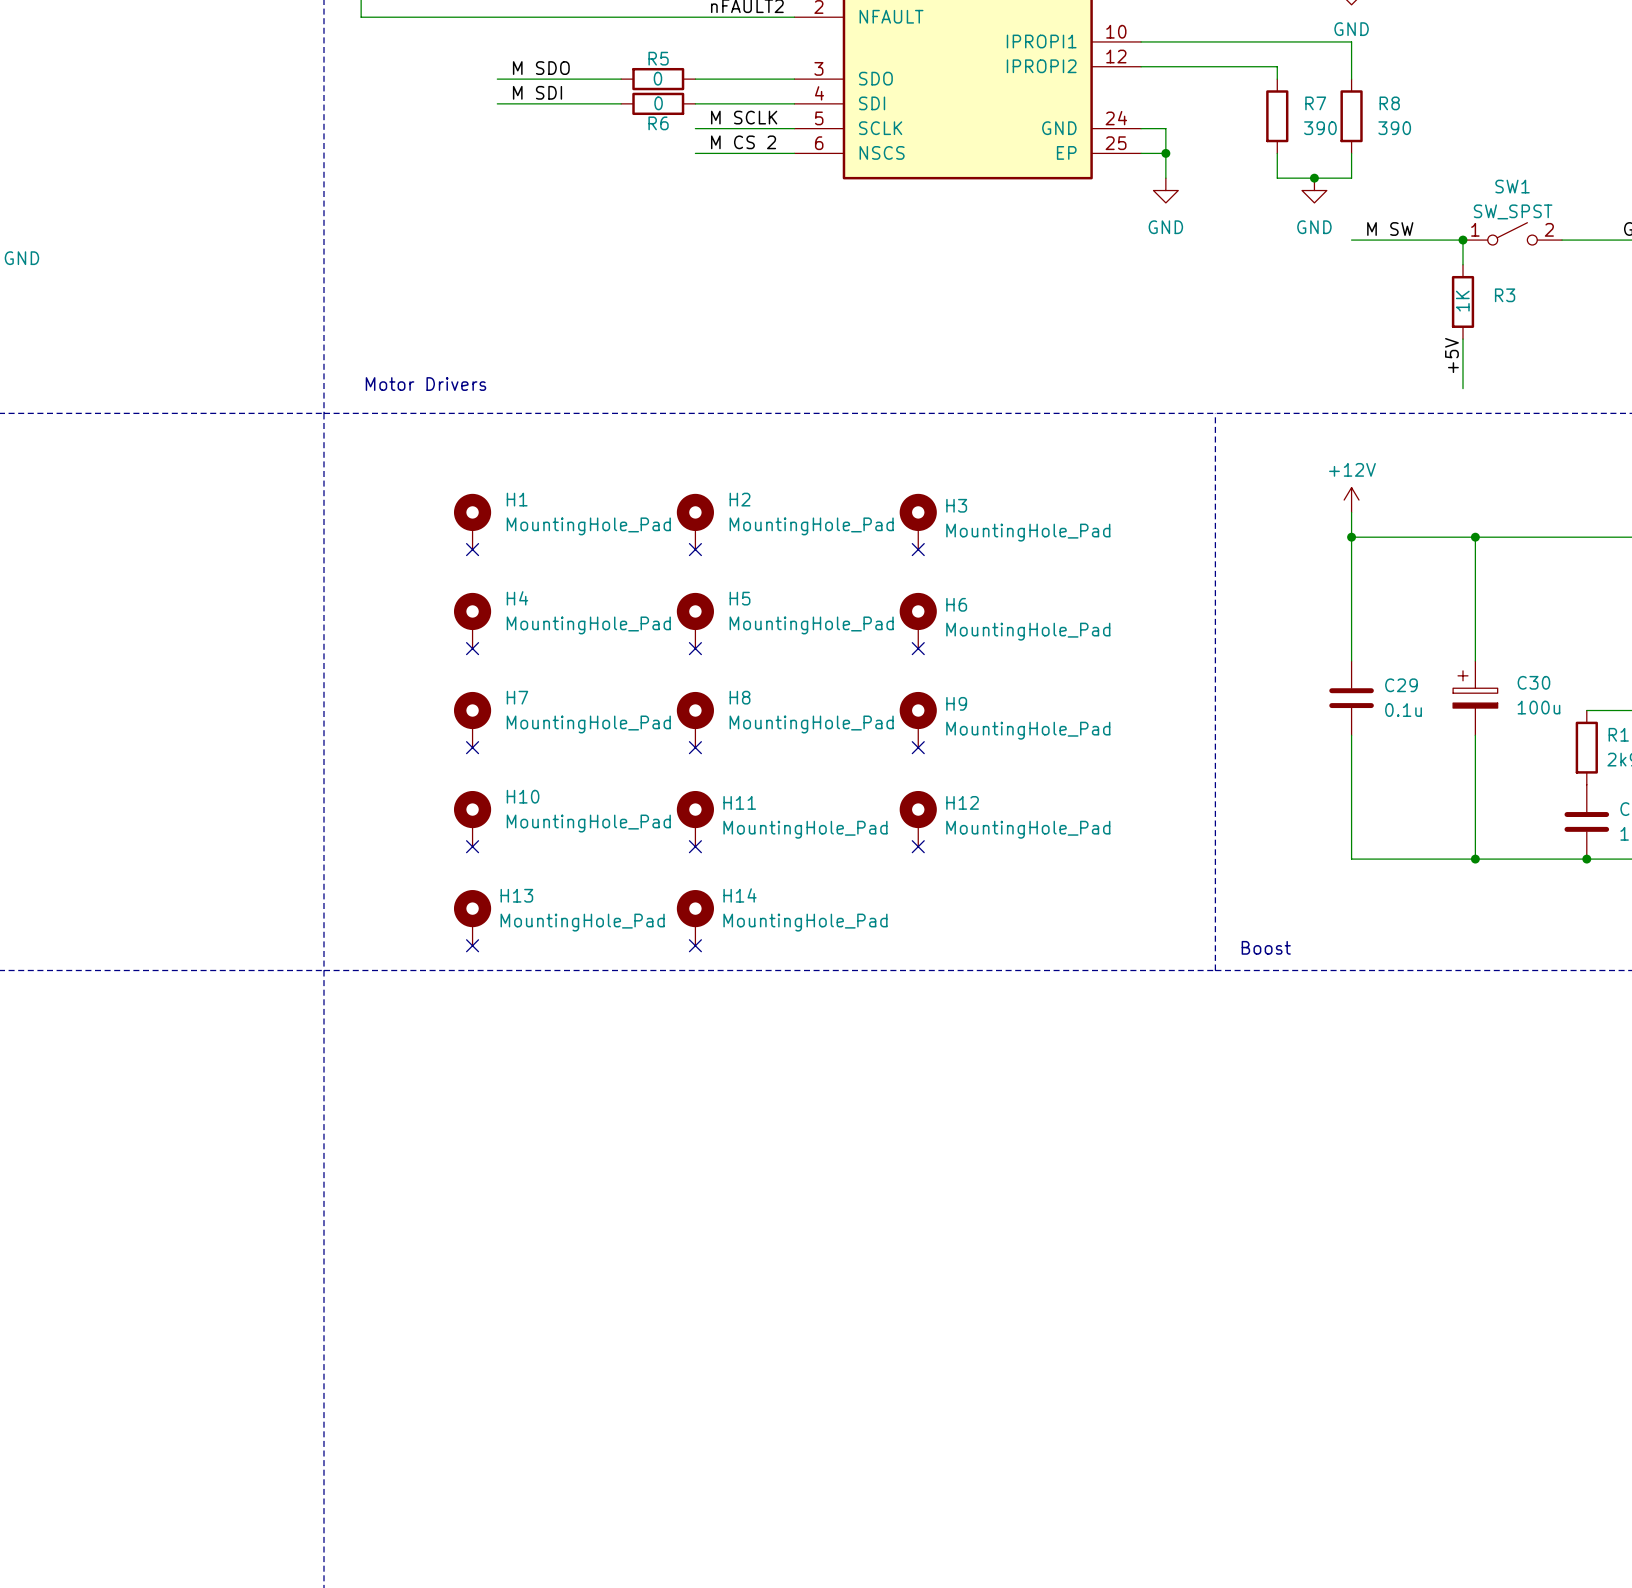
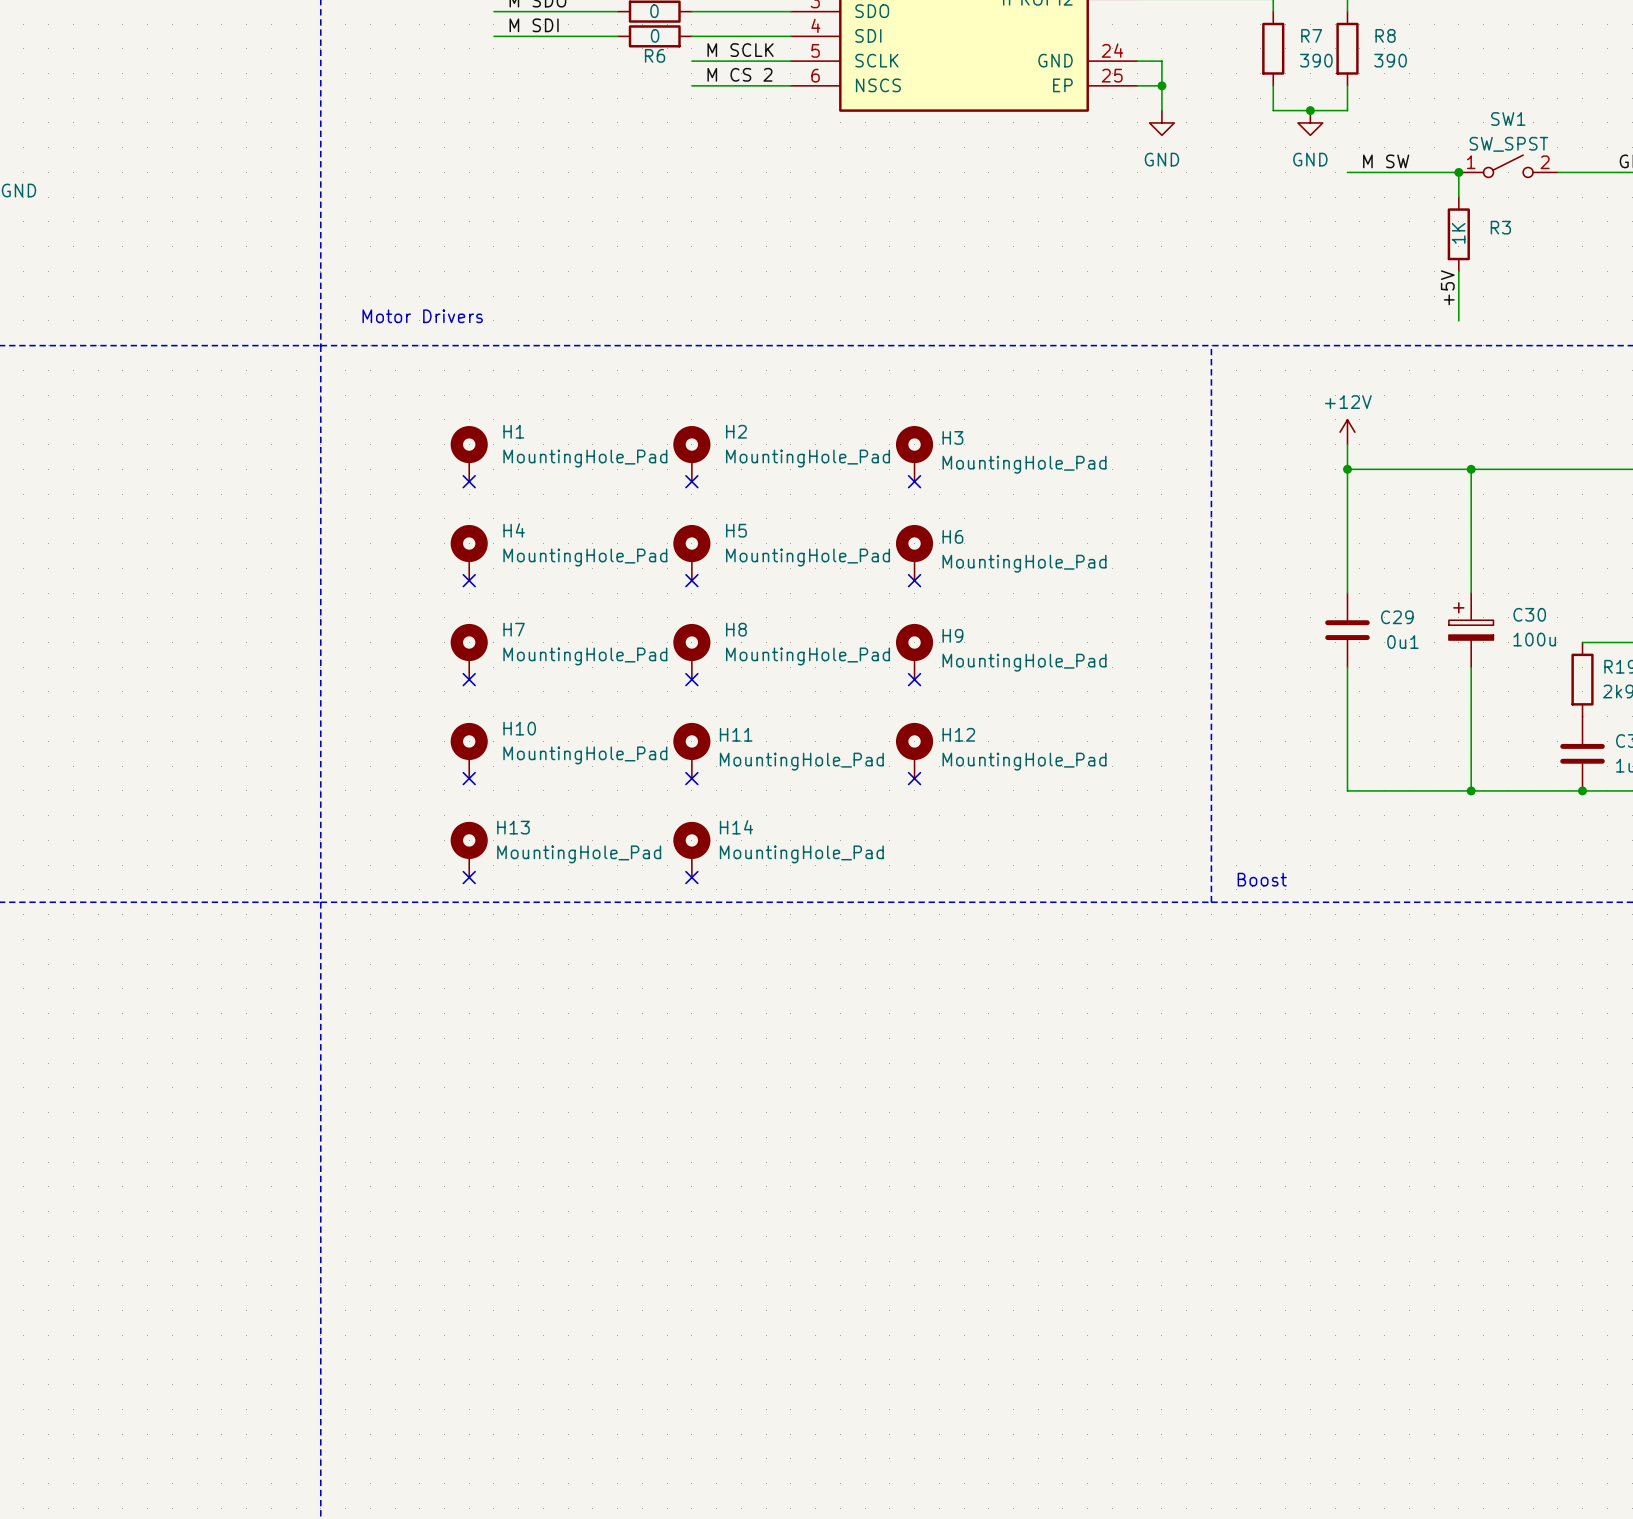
C29 value: 0.1u (1403, 710) -> 0u1 (1402, 642)

